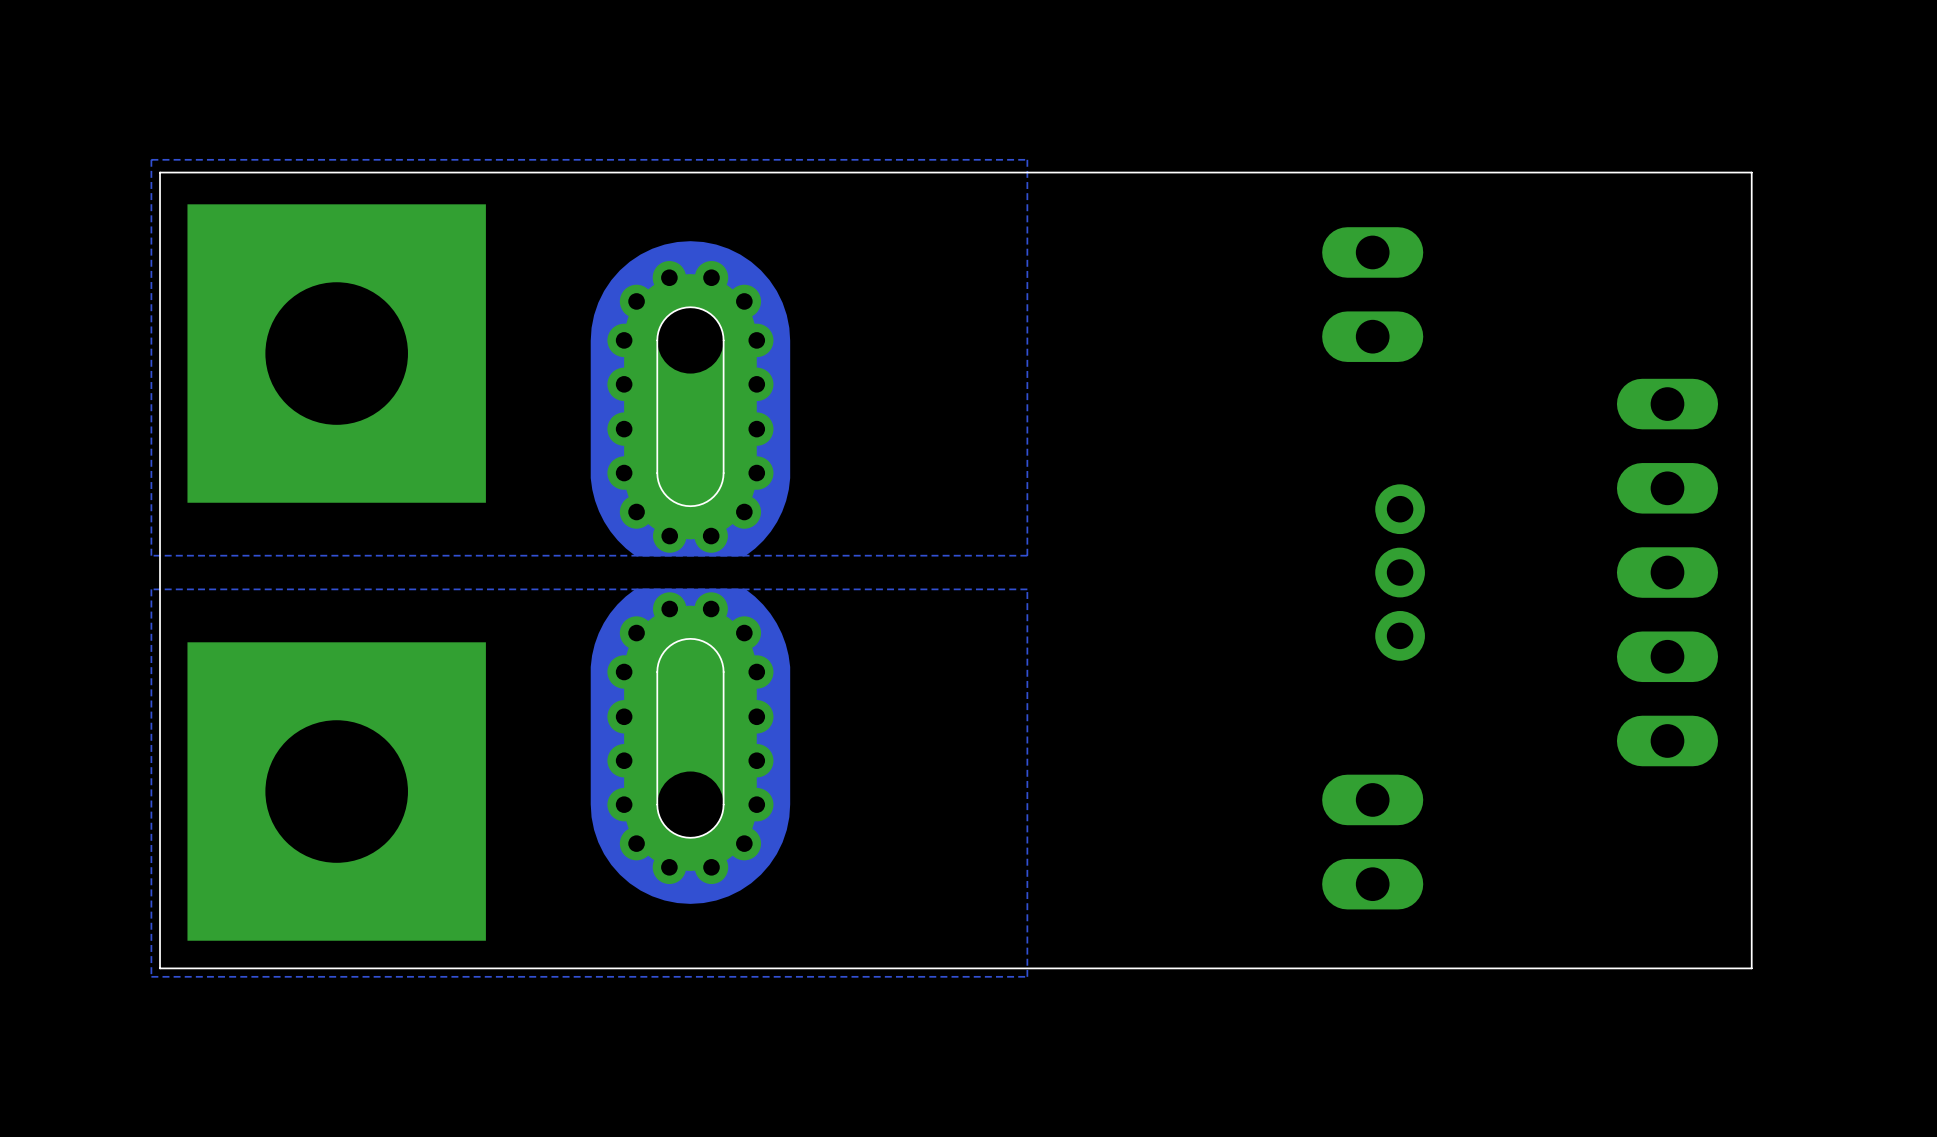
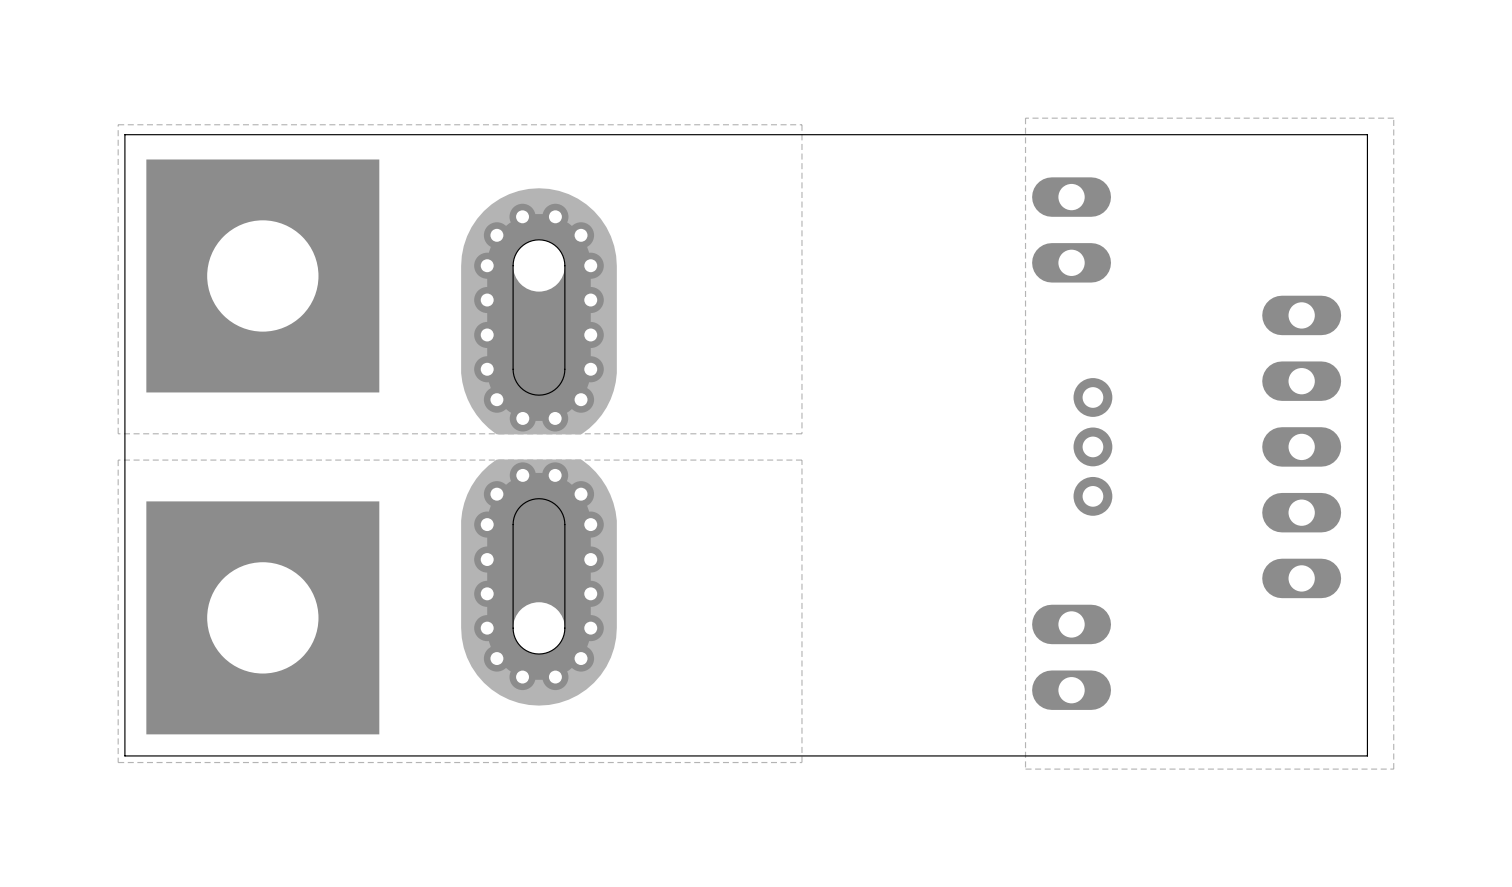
zone outline: none -> (1393, 118) (1025, 118) (1025, 769) (1393, 769) (1393, 118)

